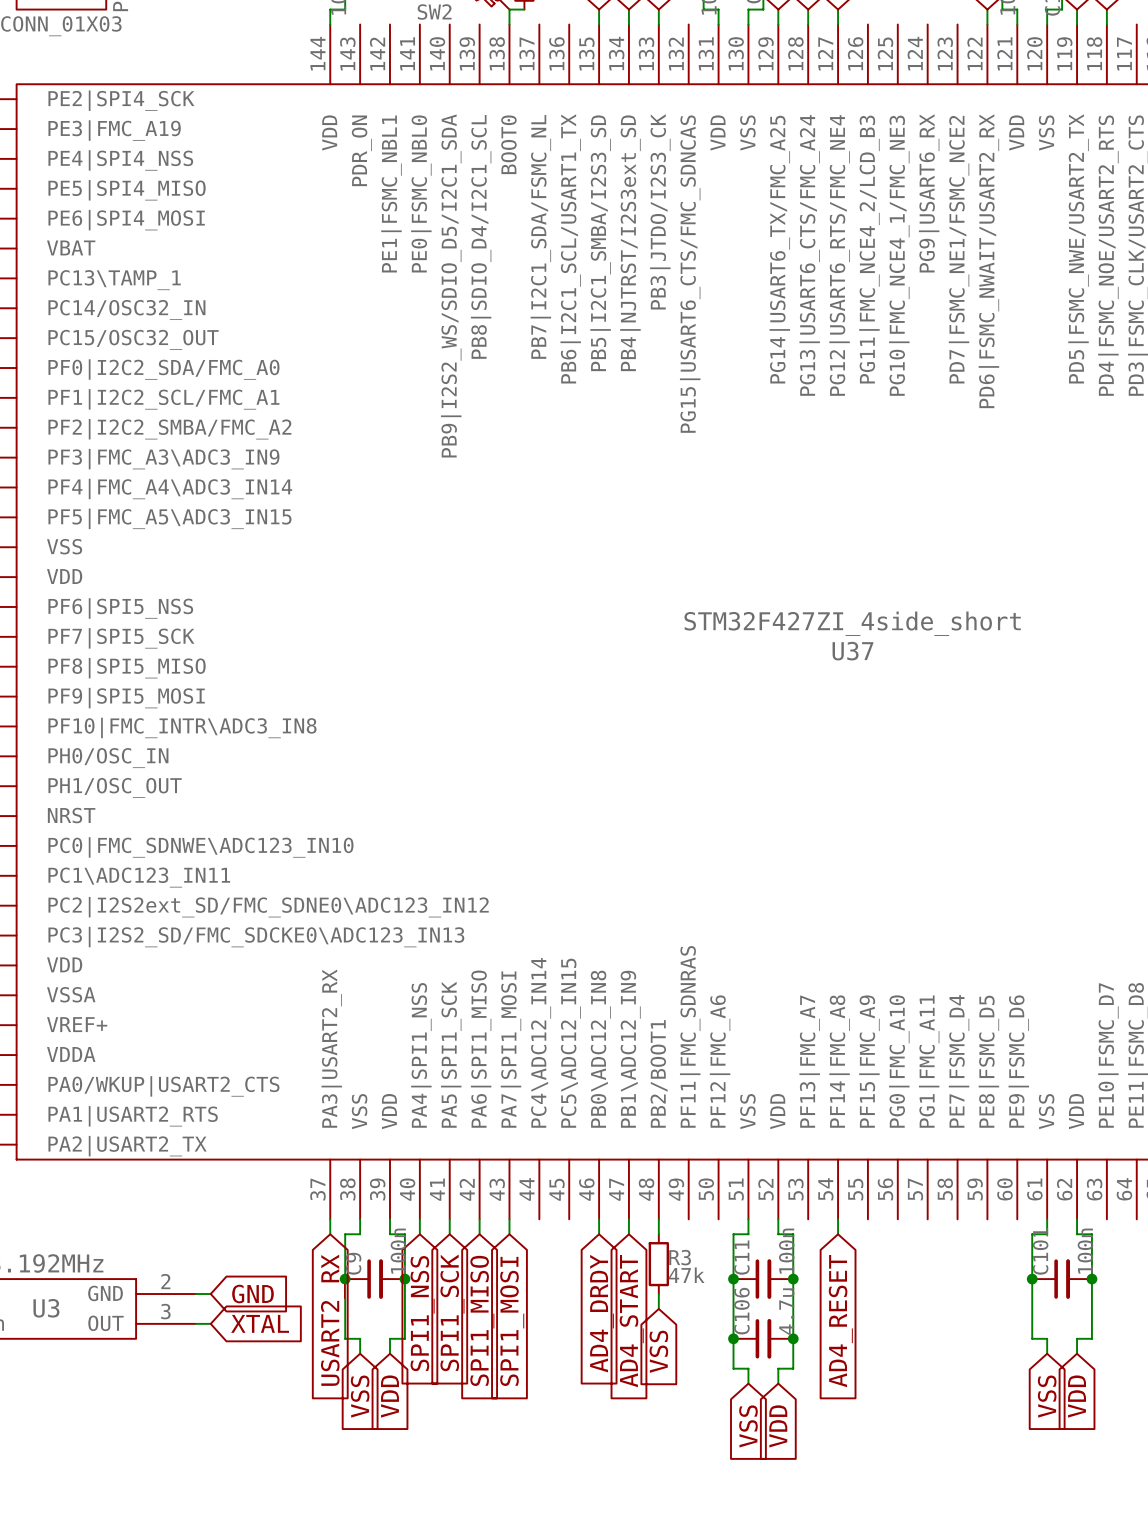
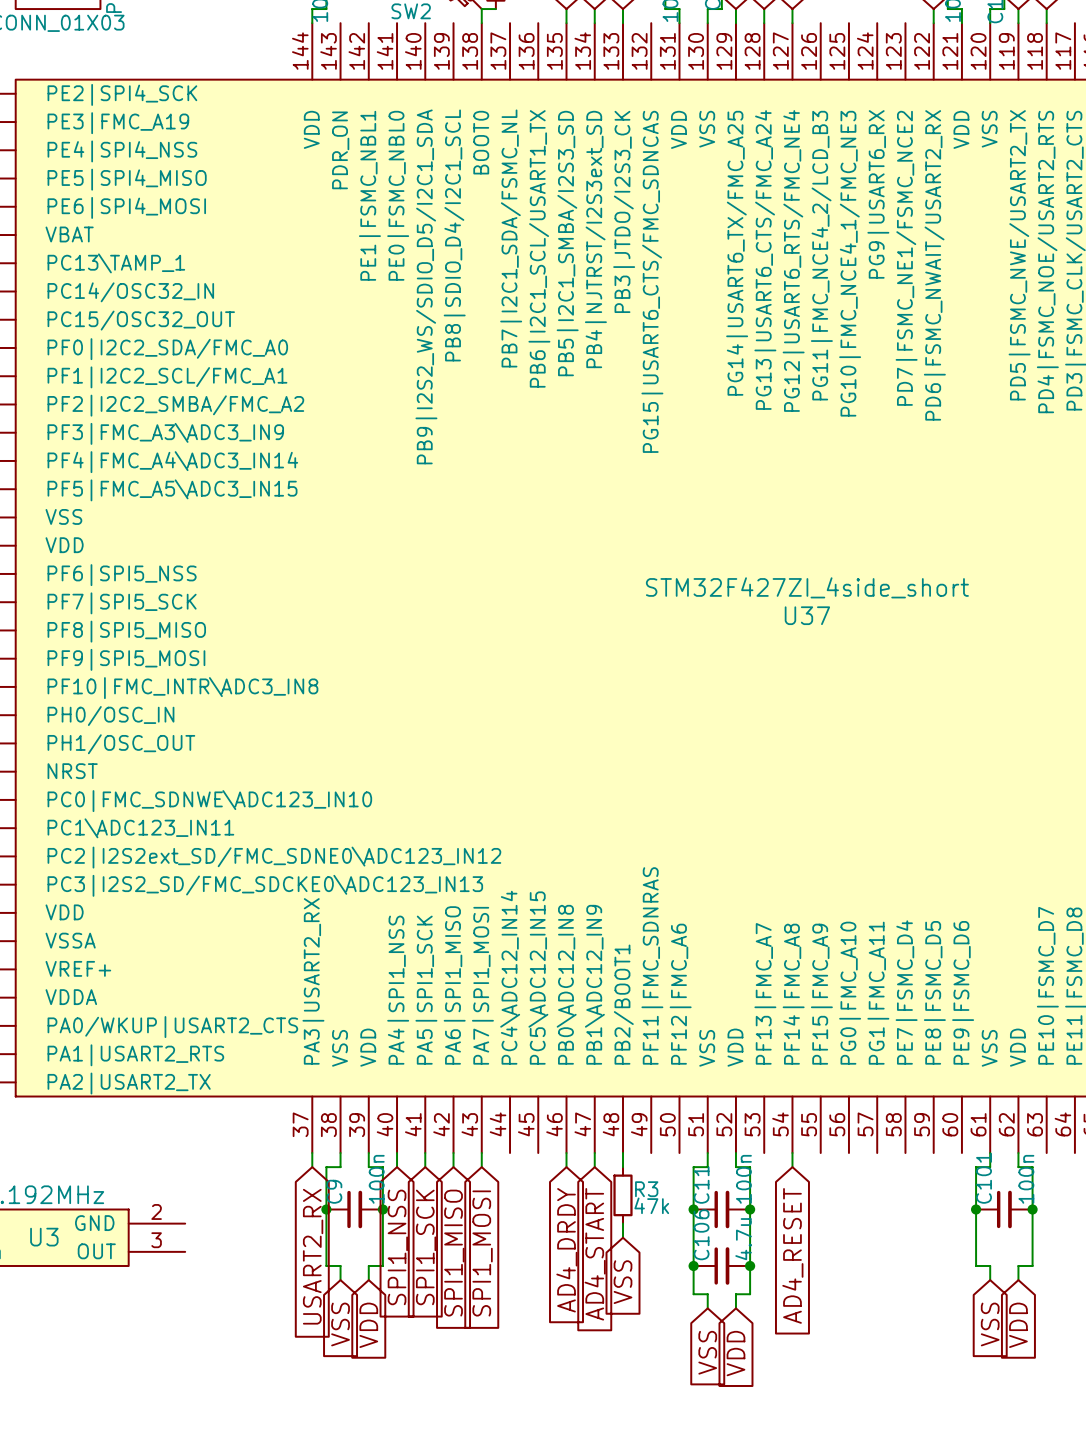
wire: (195, 1294) (210, 1294) -> none
global label: GND (252, 1294) -> none
wire: (195, 1323) (210, 1323) -> none
global label: XTAL (260, 1323) -> none

